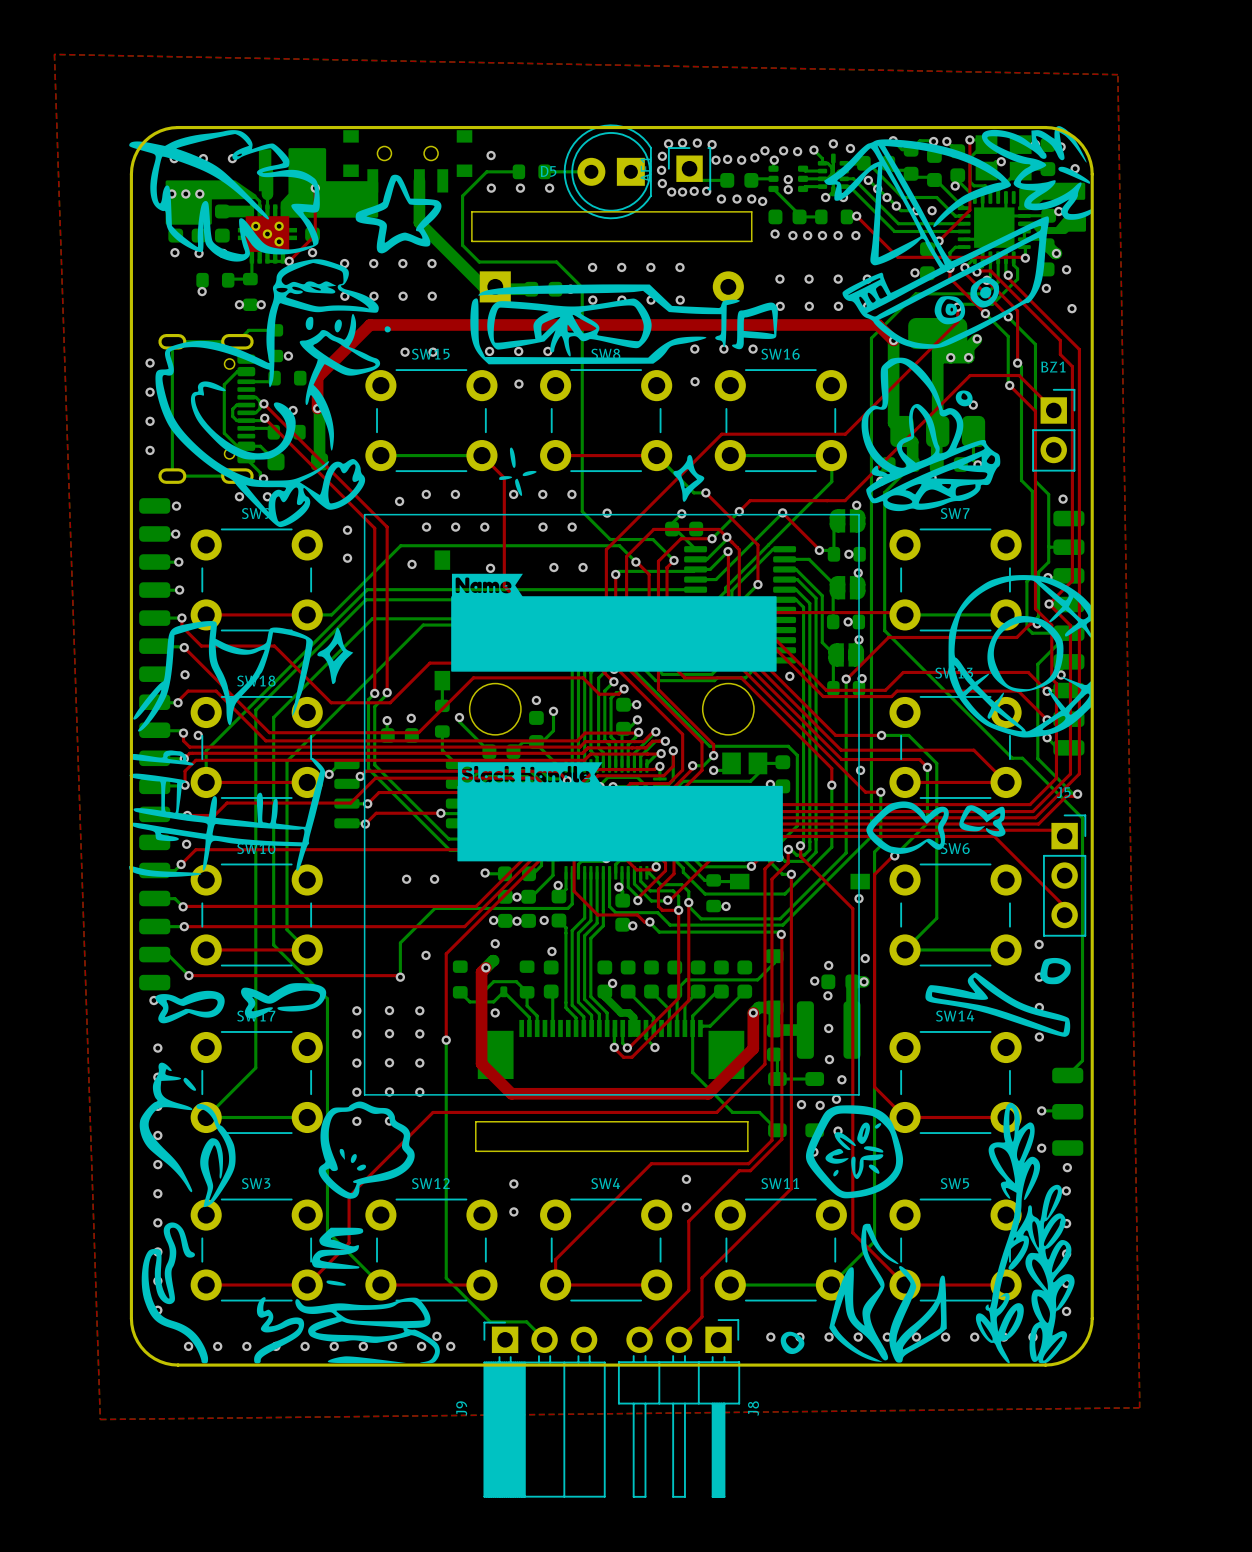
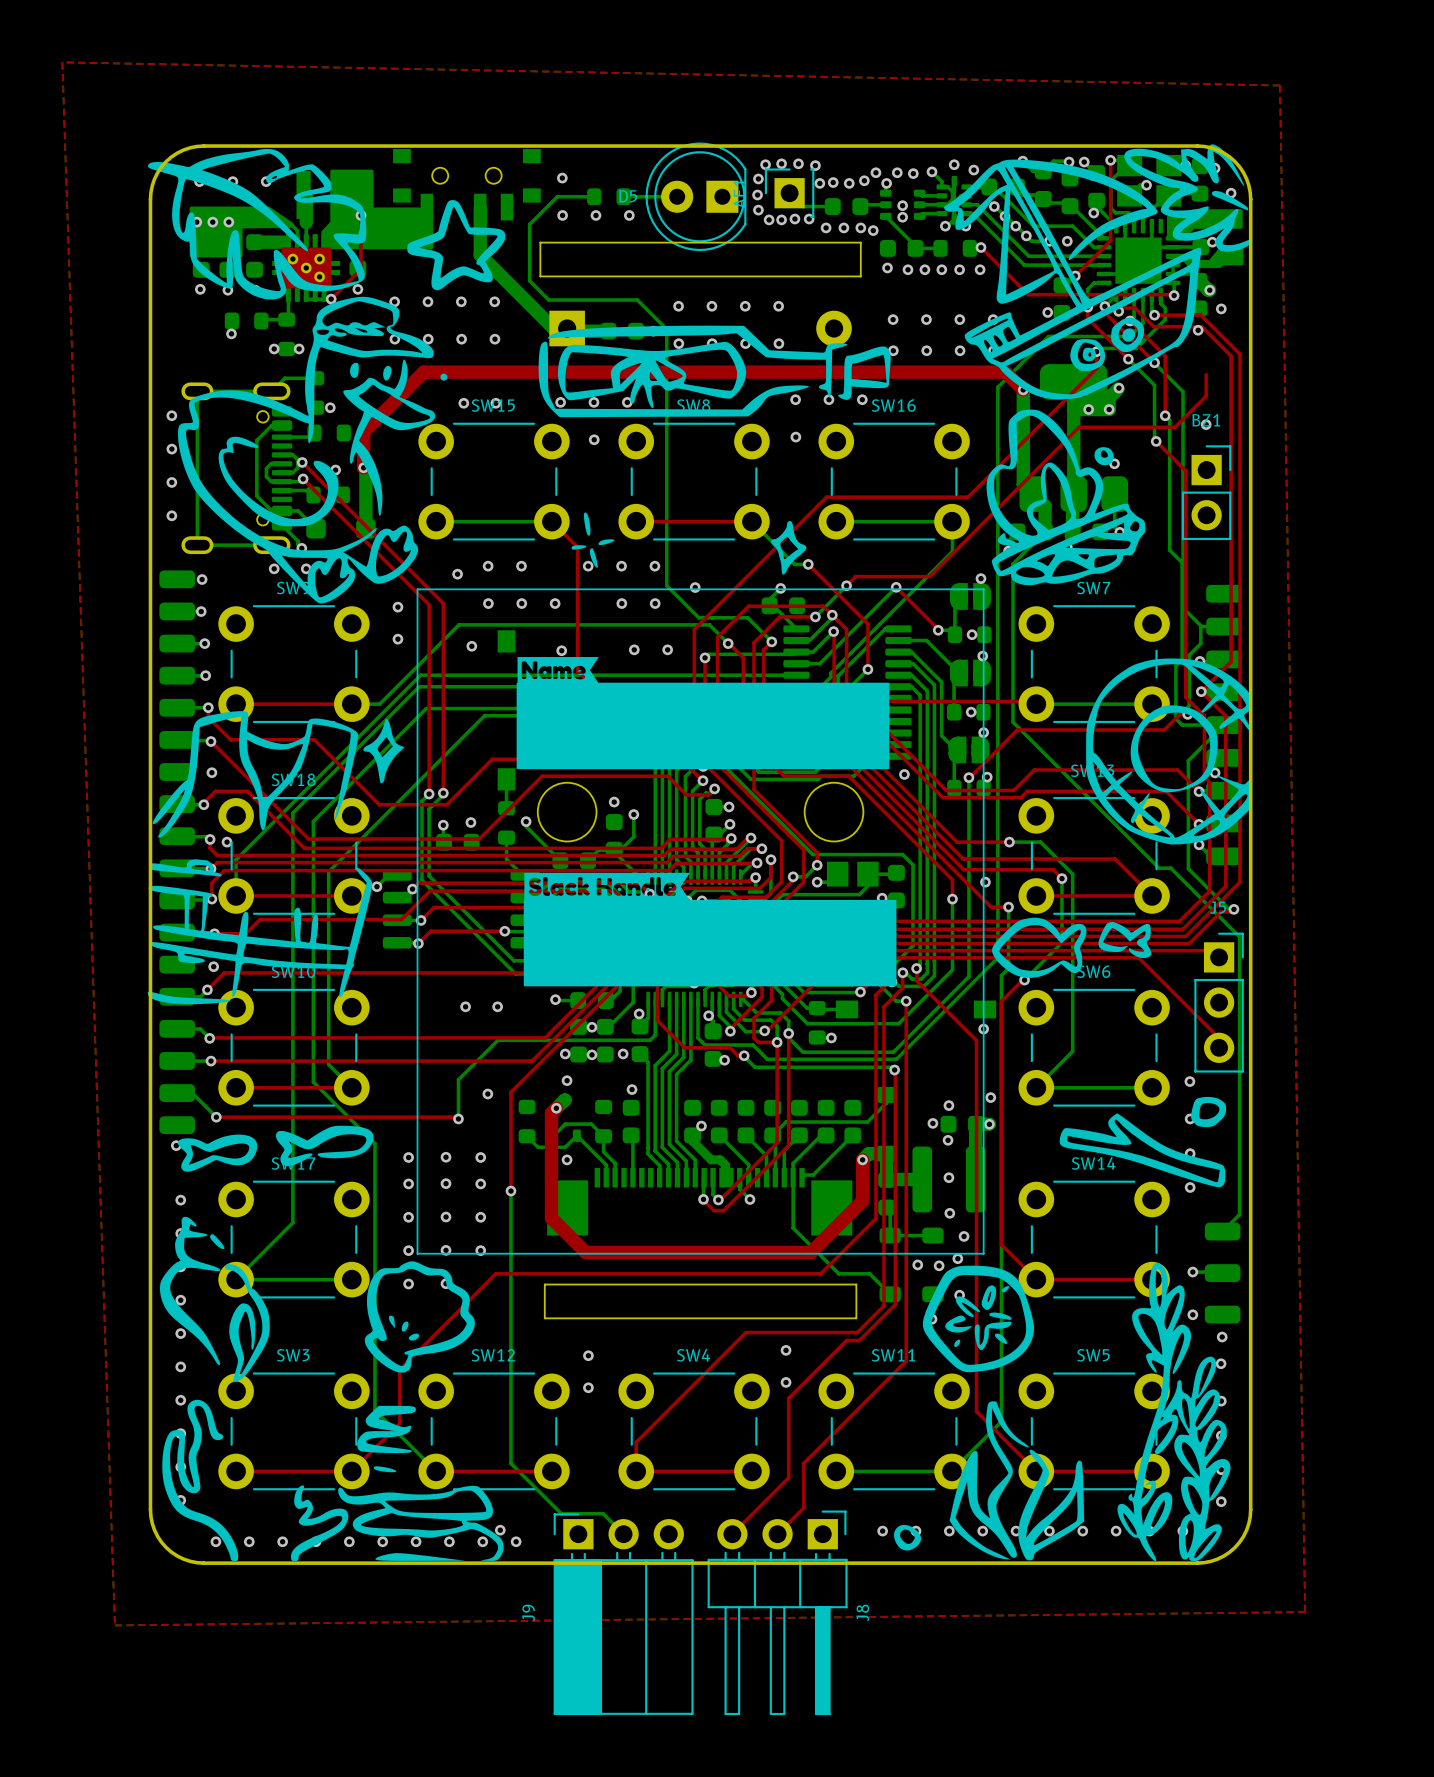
top track: (977, 270) (990, 270) (1060, 340) (1060, 354) (1072, 366) (1072, 580) -> (1119, 310) (1122, 308) (1134, 308) (1153, 326) (1201, 326) (1231, 356) (1231, 661) (1228, 664)
top track: (1008, 275) (1008, 278) (1079, 349) (1079, 773) -> (1154, 312) (1157, 315) (1200, 315) (1240, 354) (1240, 882) (1236, 886)
via: (1072, 308) -> none
bottom track: (1033, 342) (1035, 344) (1035, 481) (1048, 494) (1048, 546) -> (1183, 391) (1183, 607) (1200, 625)
via: none -> (1206, 424)
top track: (1053, 410) (1019, 375) (970, 375) (845, 500) (750, 500) (747, 503) -> (1206, 374) (1206, 396) (1175, 427) (1079, 427) (929, 576) (855, 576)
via: (1063, 499) -> none

